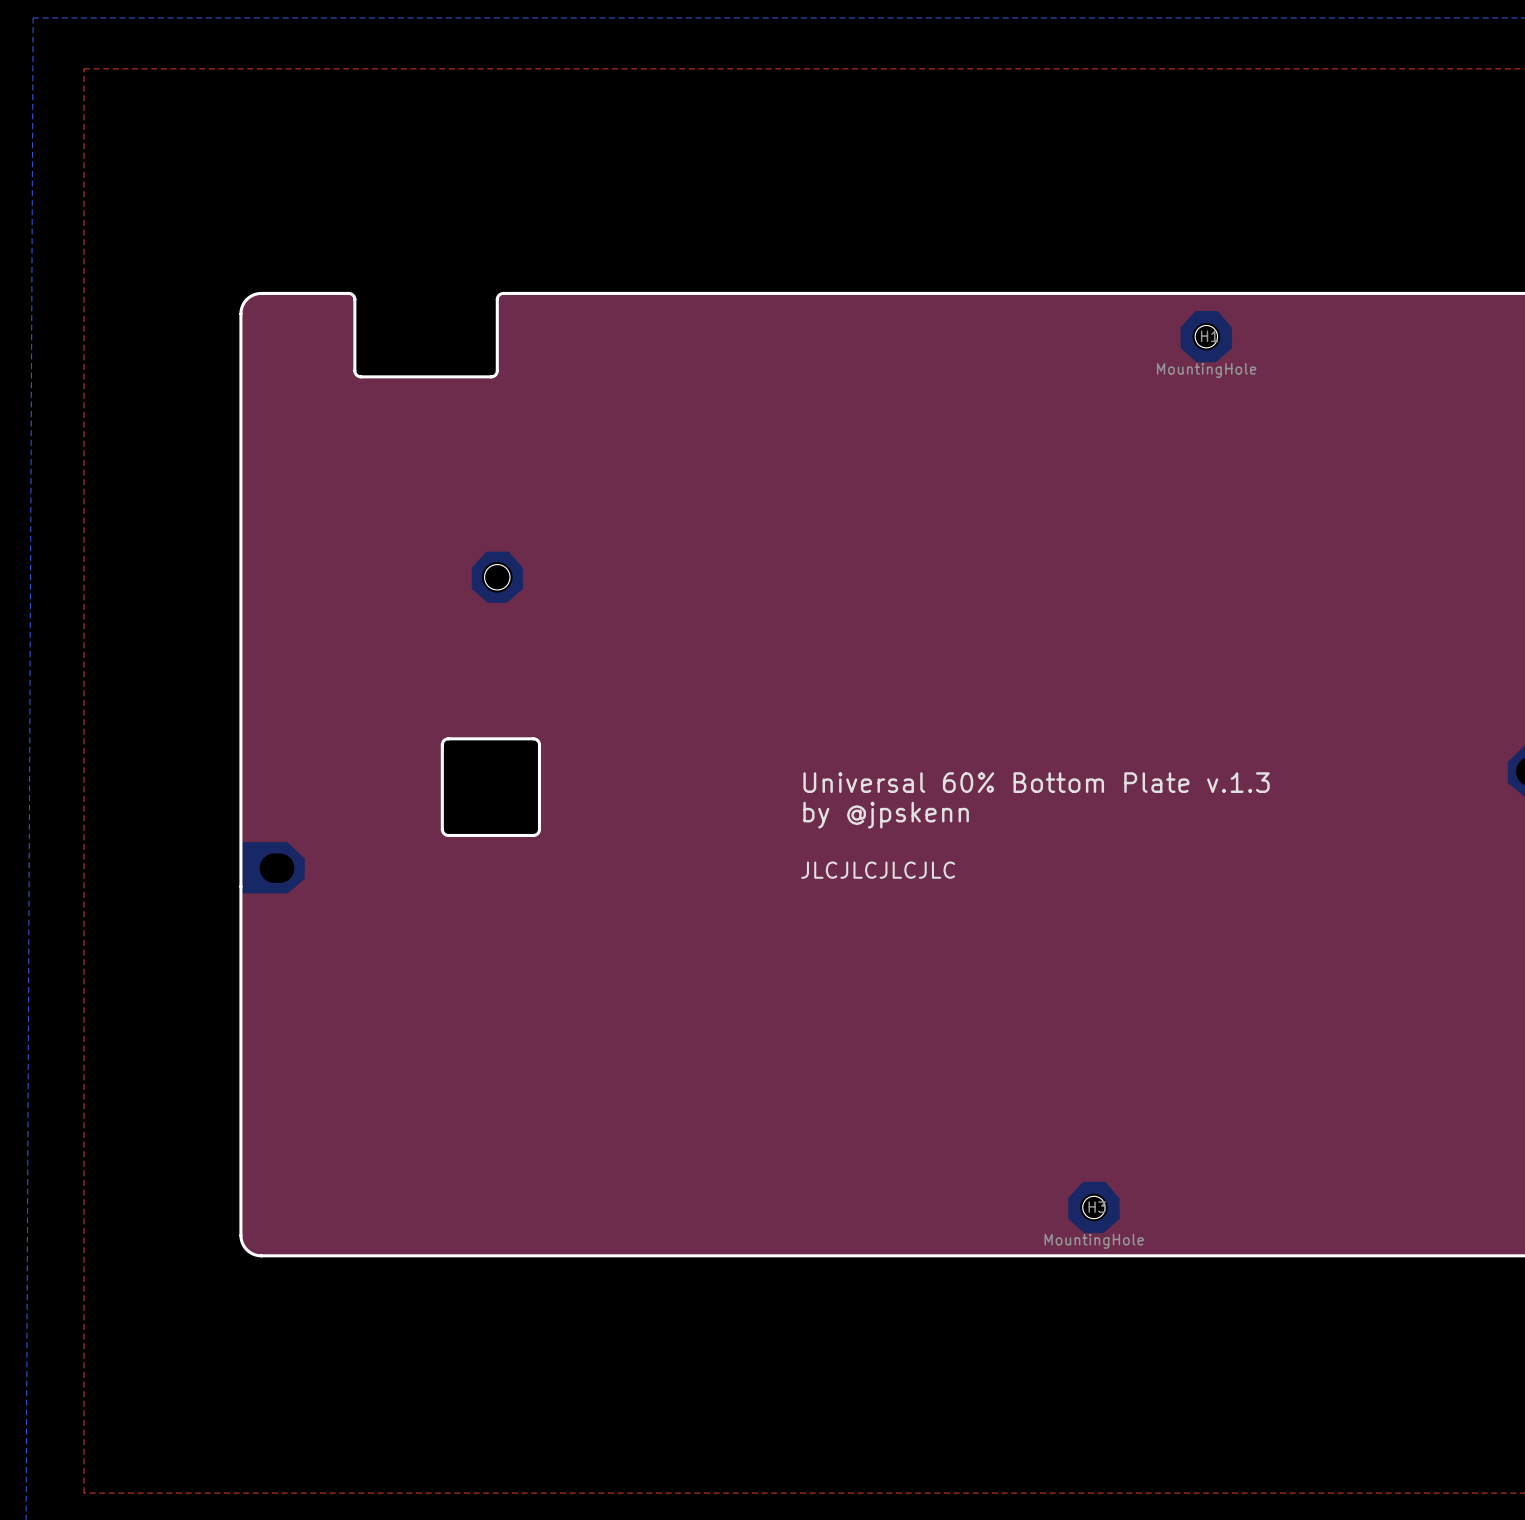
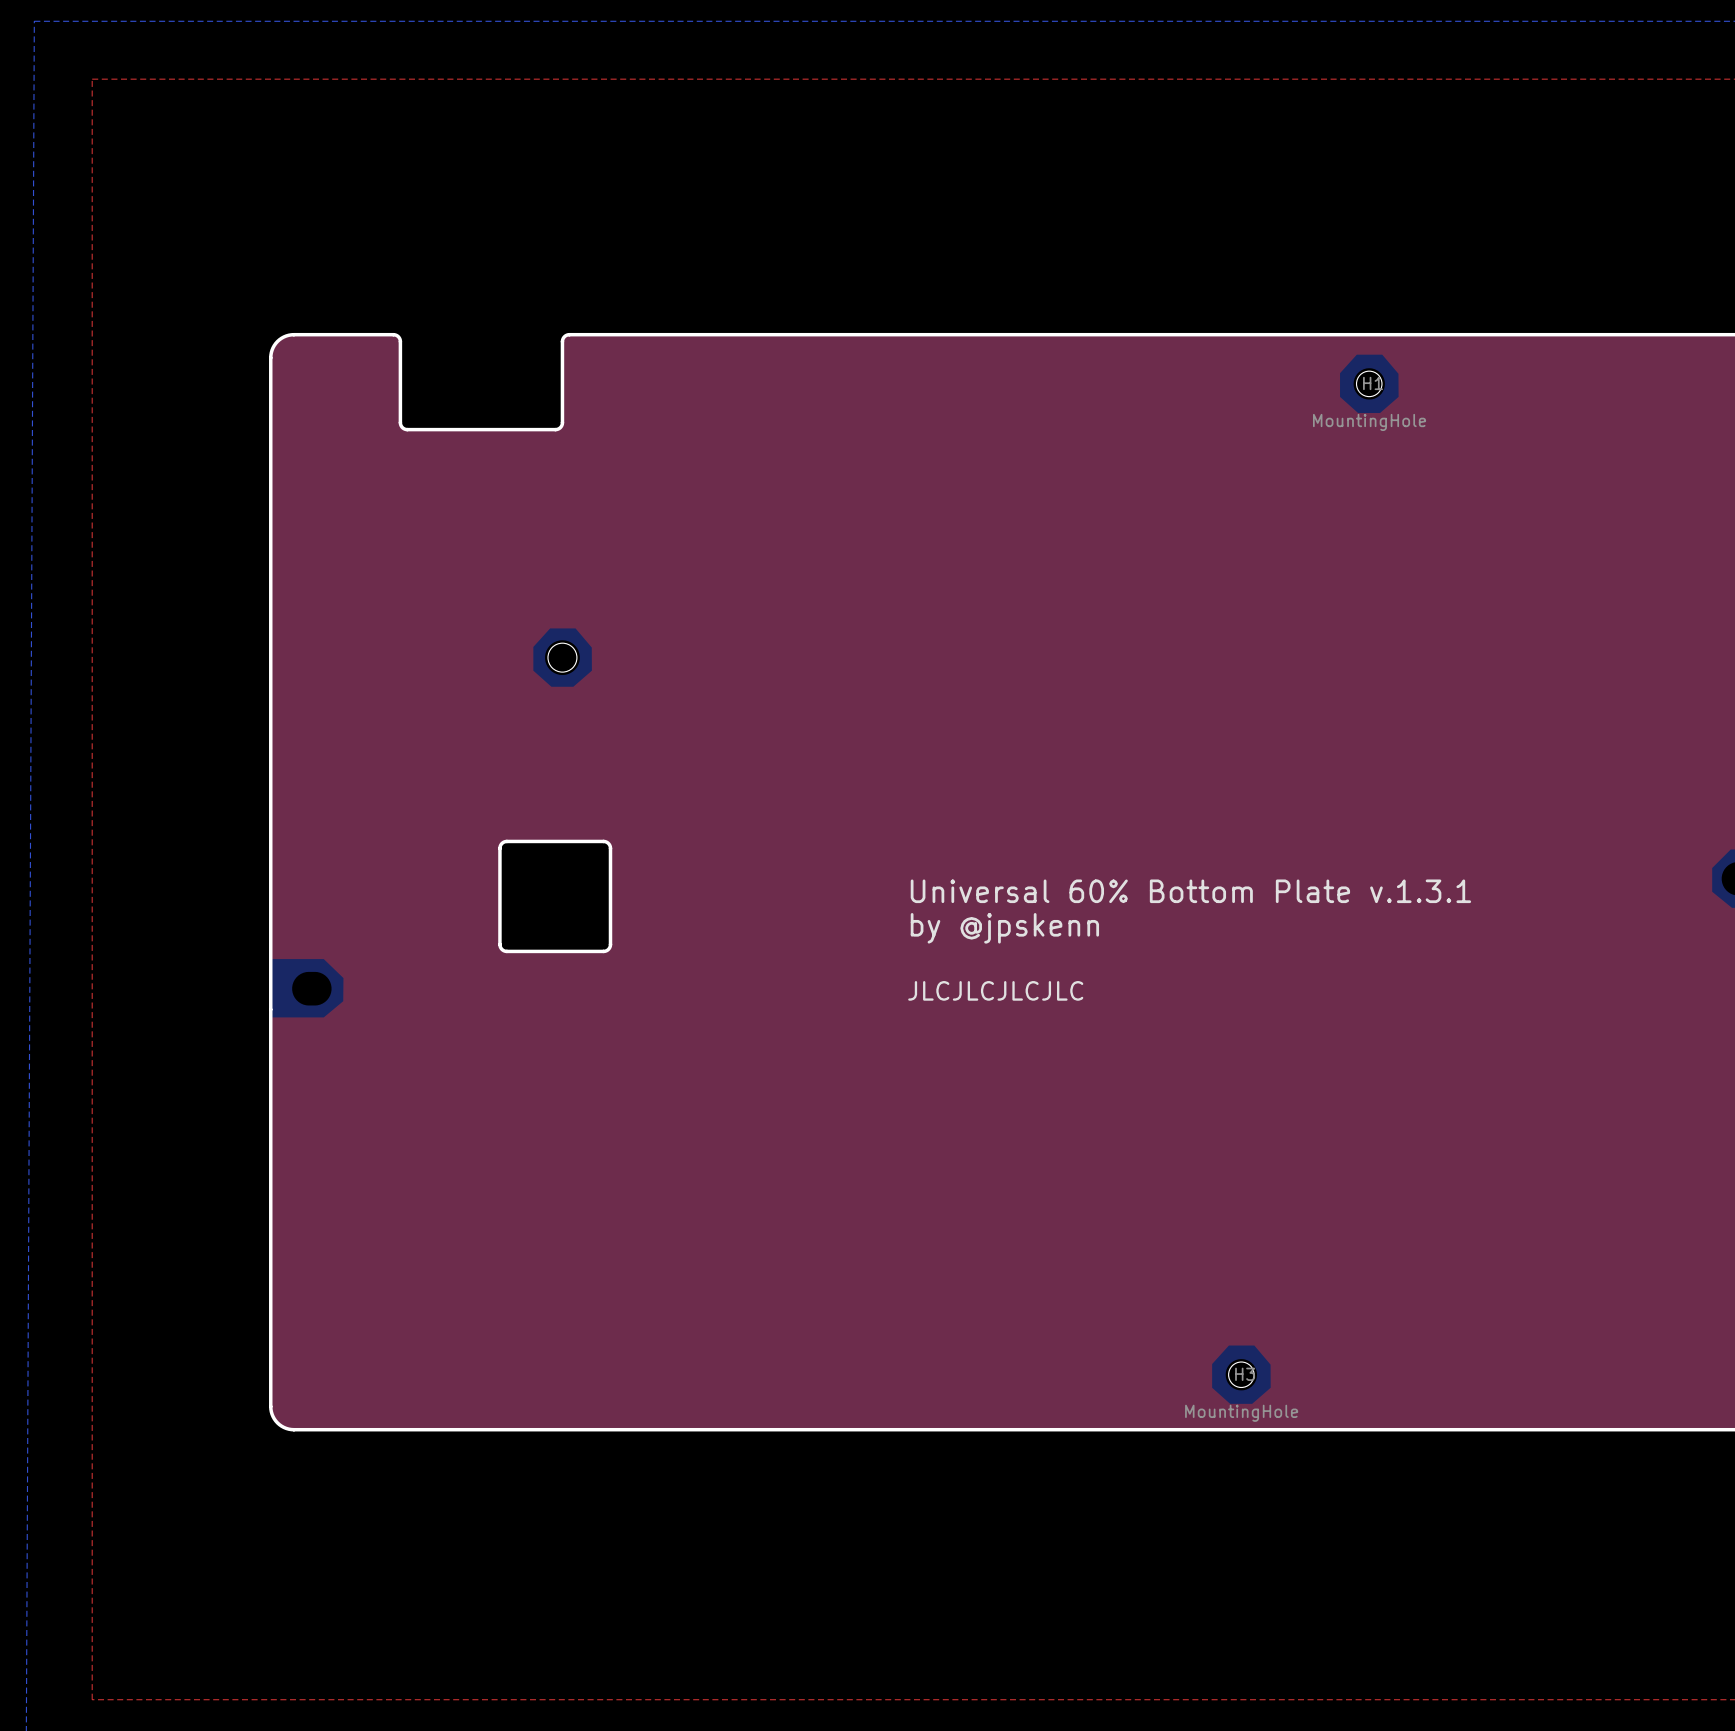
text: Universal 60% Bottom Plate v.1.3 (1036, 782) -> Universal 60% Bottom Plate v.1.3.1 (1190, 891)

